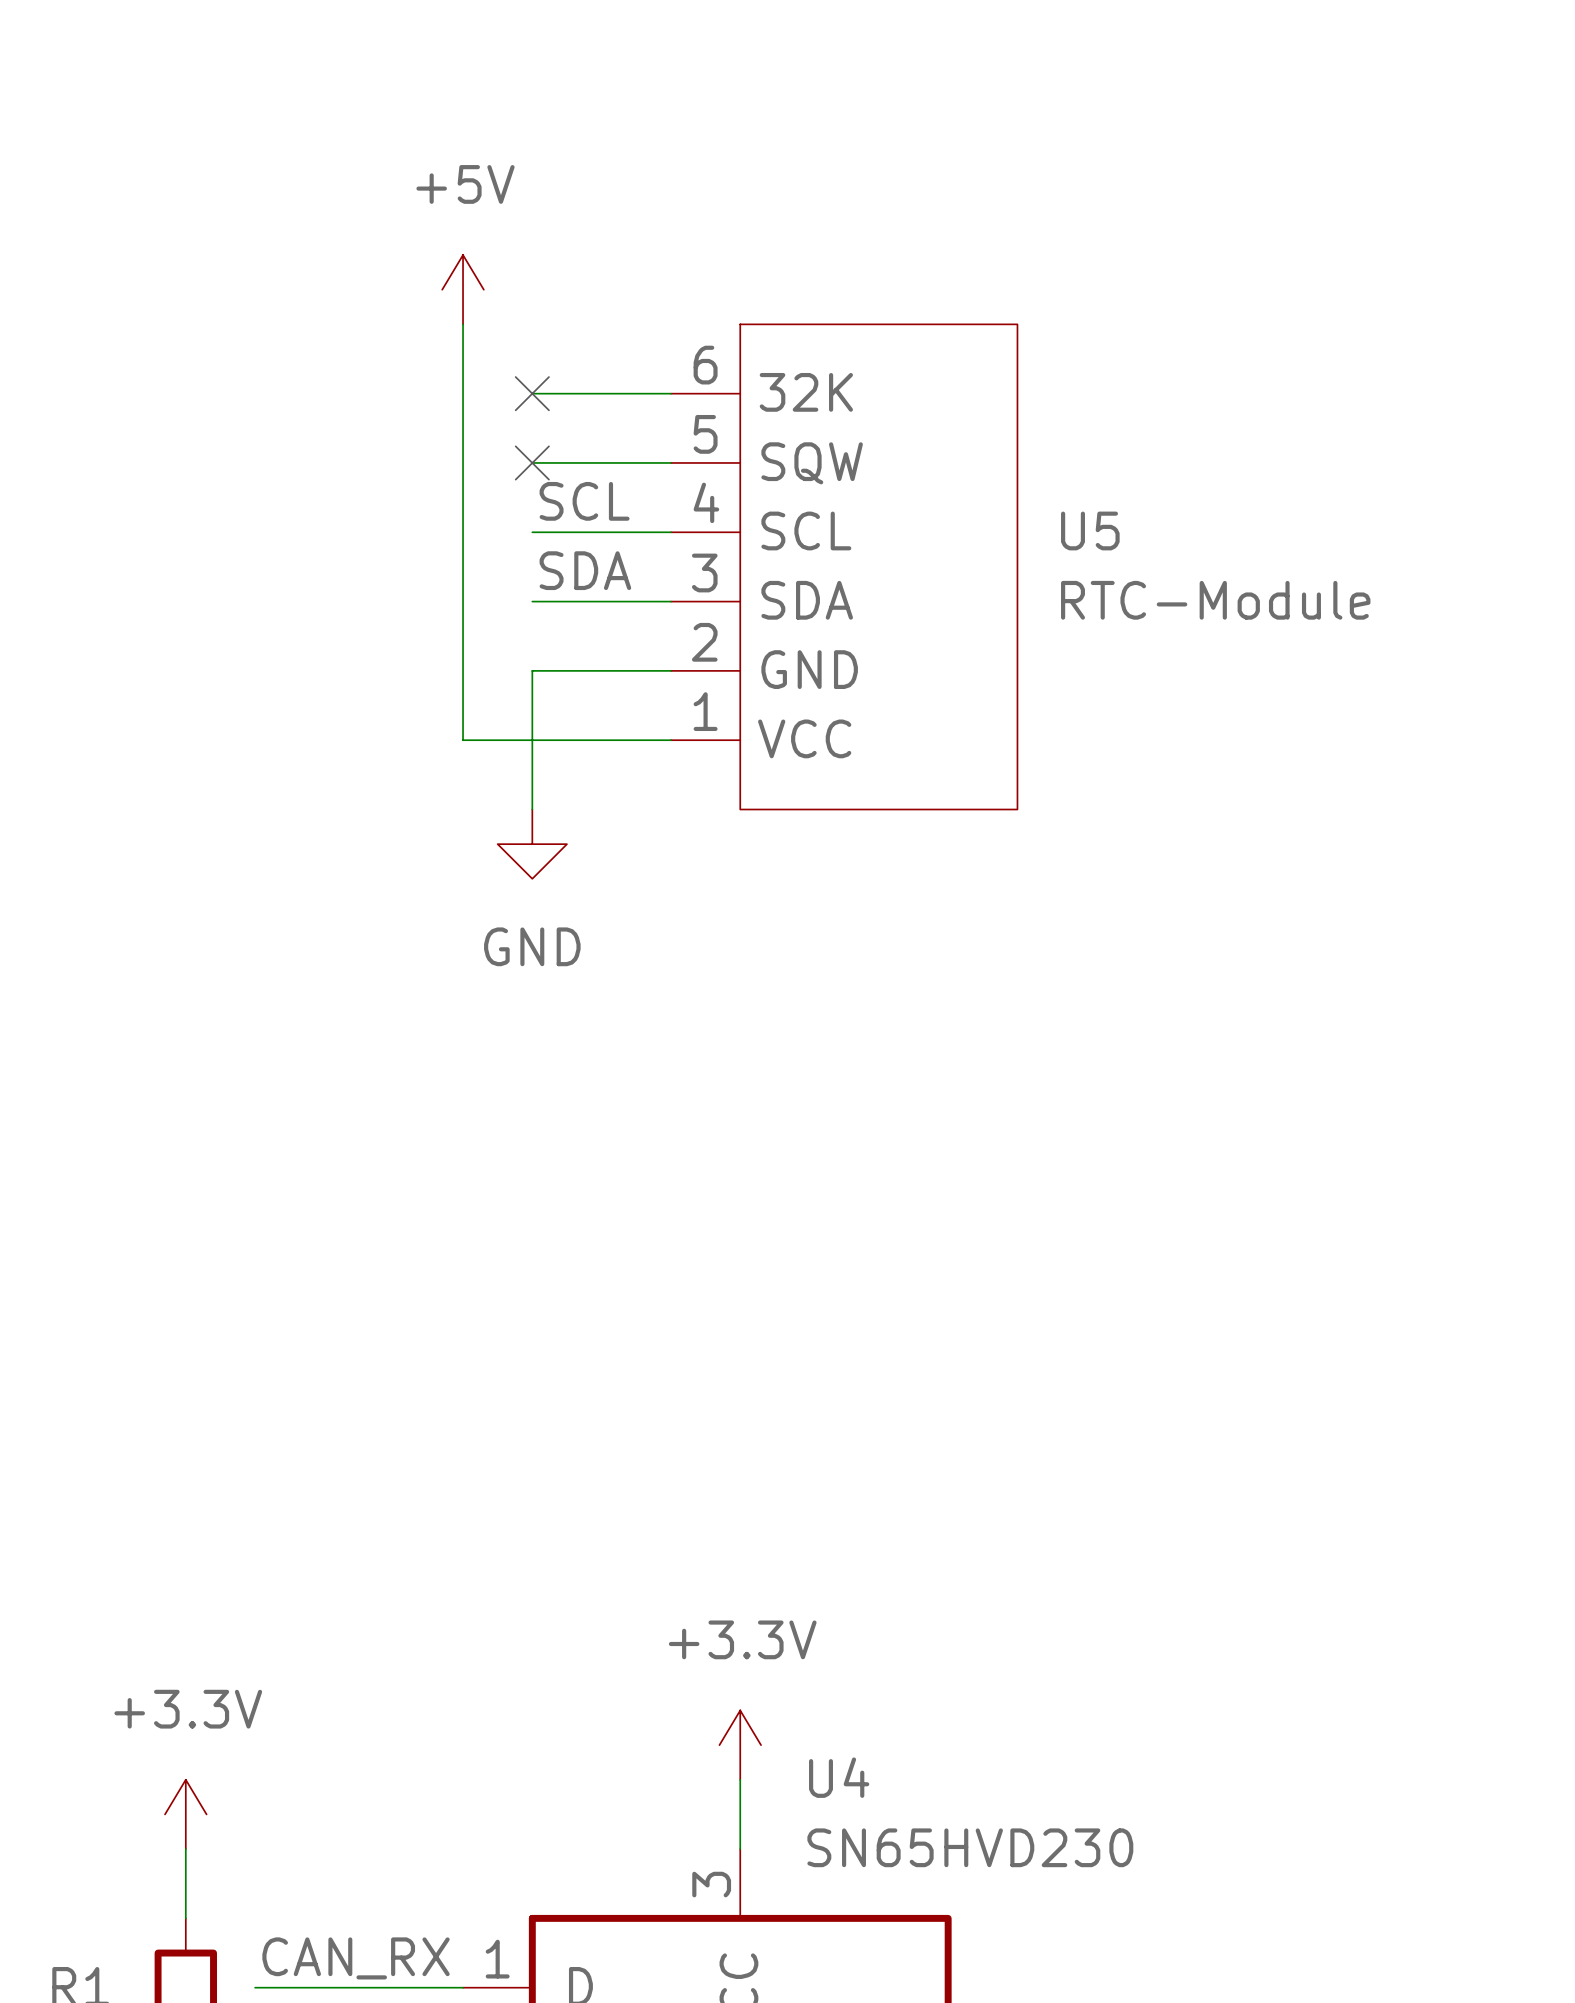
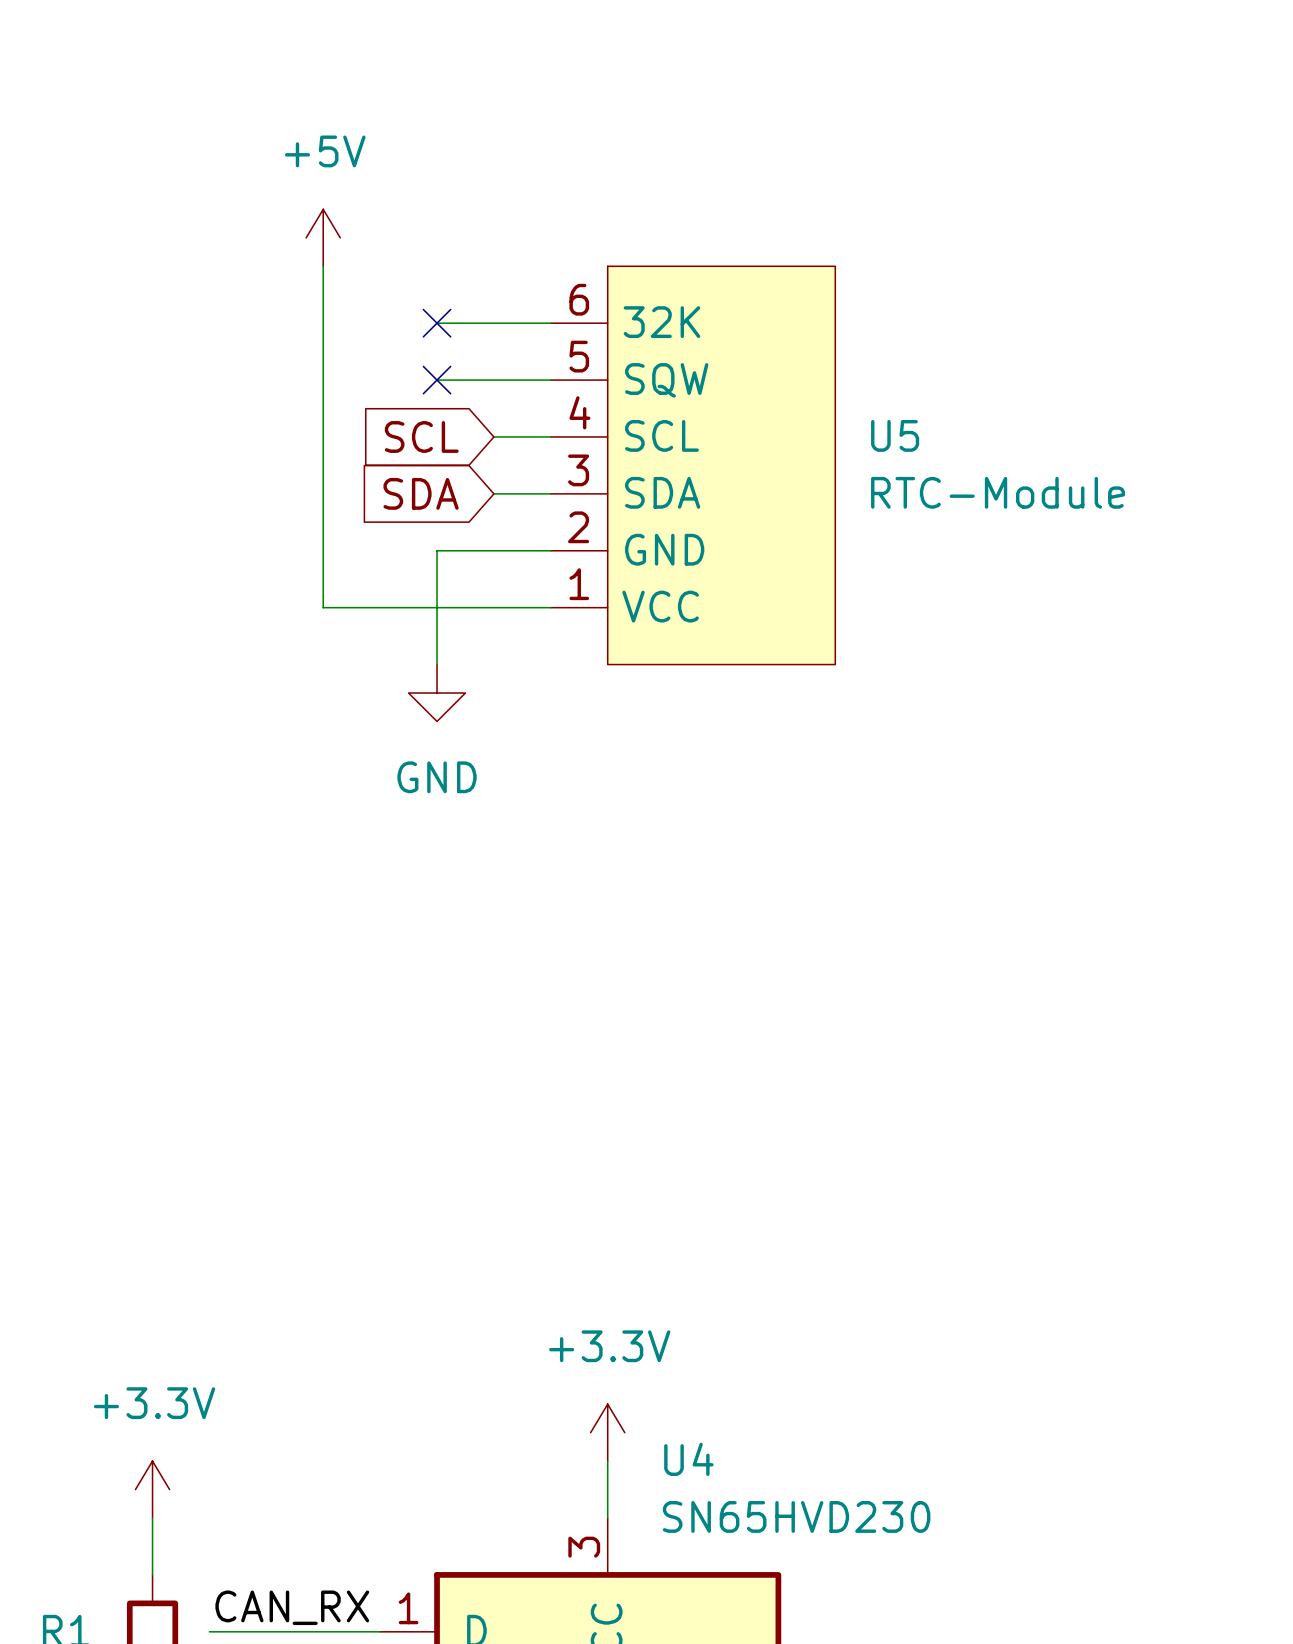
power symbol position: +5V (463, 289) -> +5V (323, 237)
wire: (463, 324) (463, 740) -> (323, 266) (323, 607) (380, 607)
label: SCL (584, 501) -> none
global label: none -> SCL (421, 436)
wire: (532, 532) (601, 532) -> none
label: SDA (585, 570) -> none
global label: none -> SDA (421, 493)
wire: (532, 601) (601, 601) -> none

